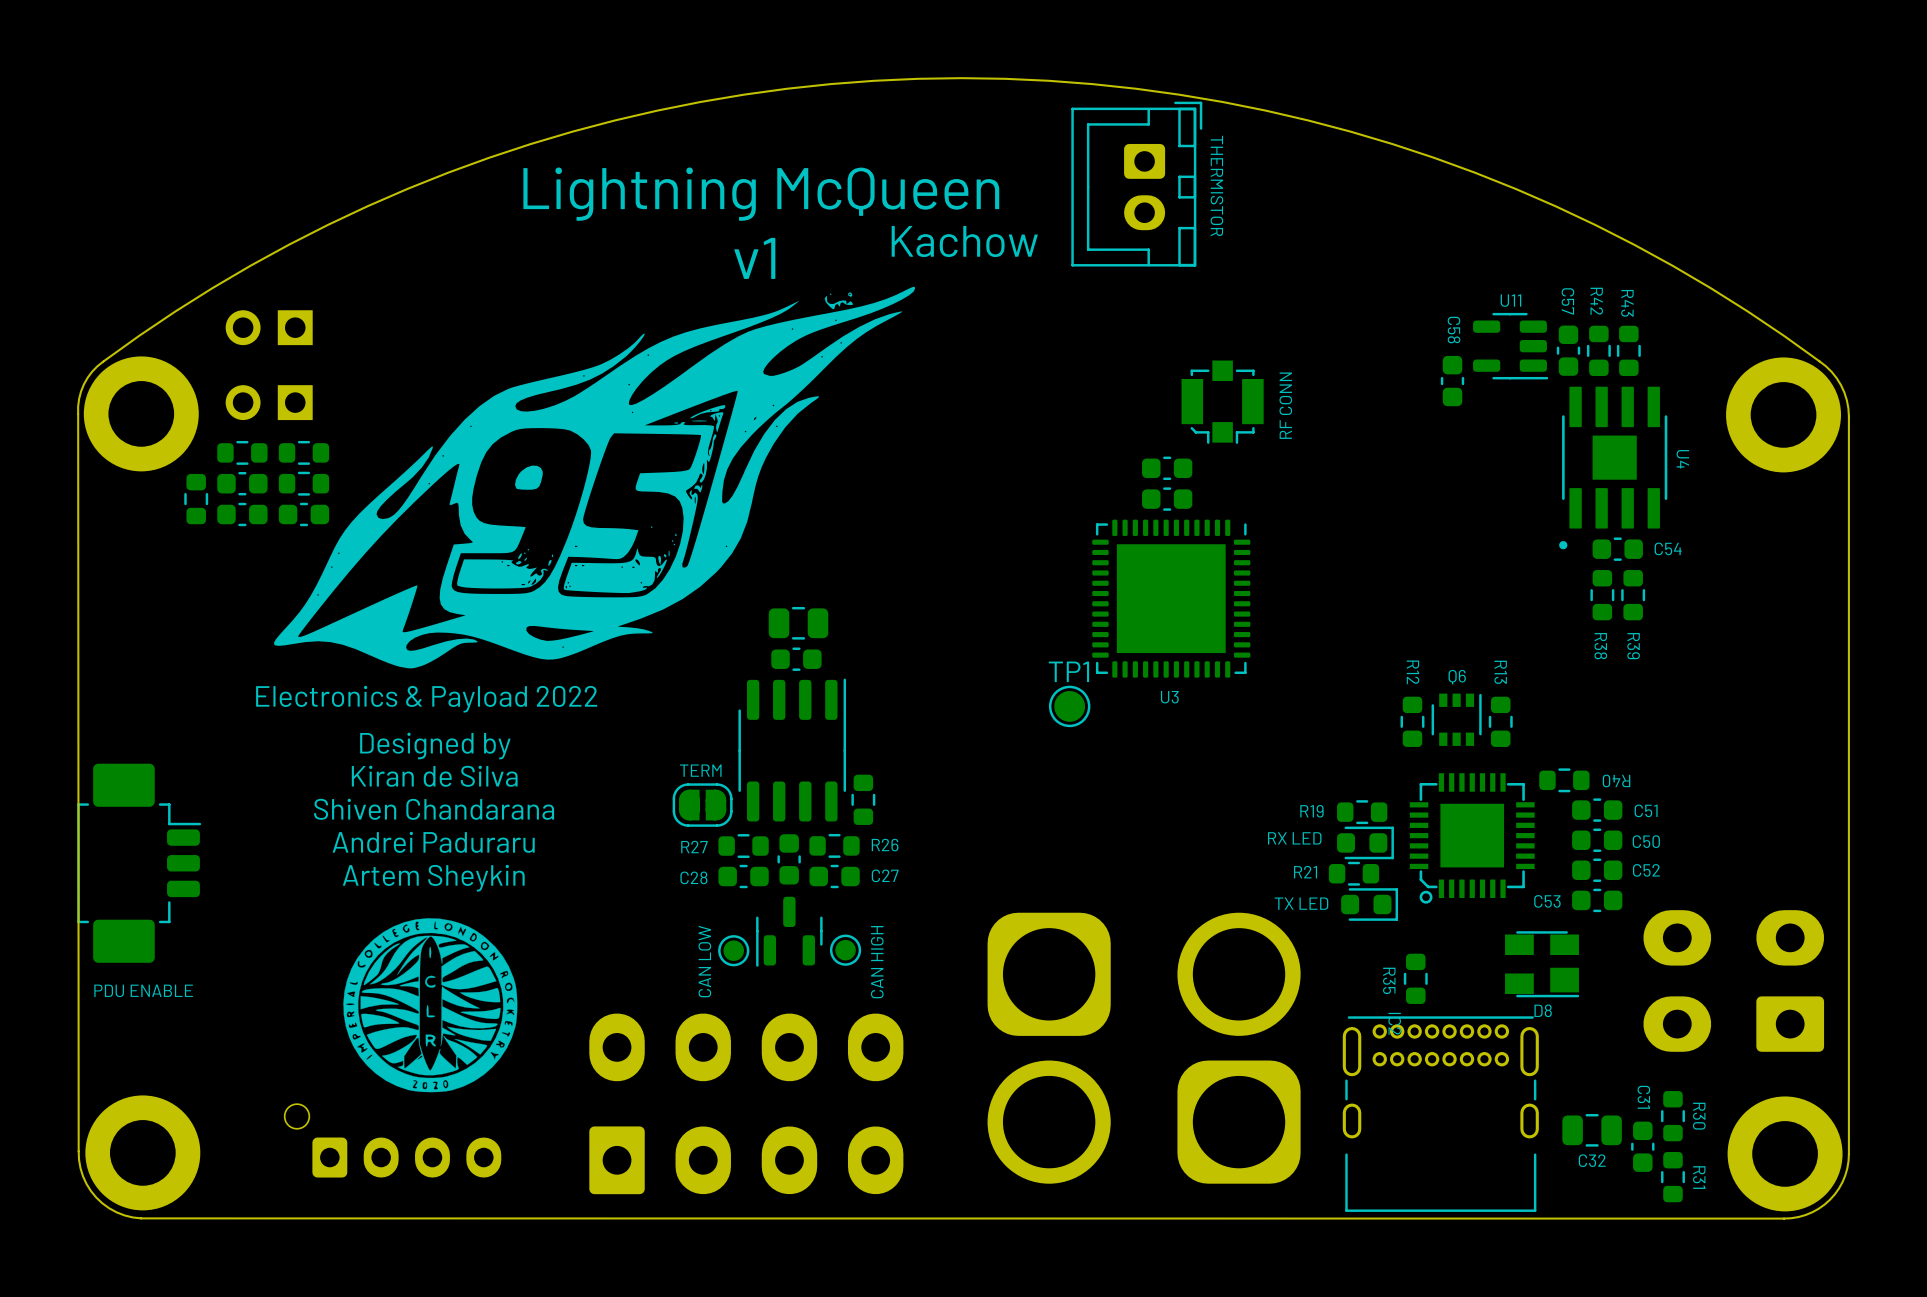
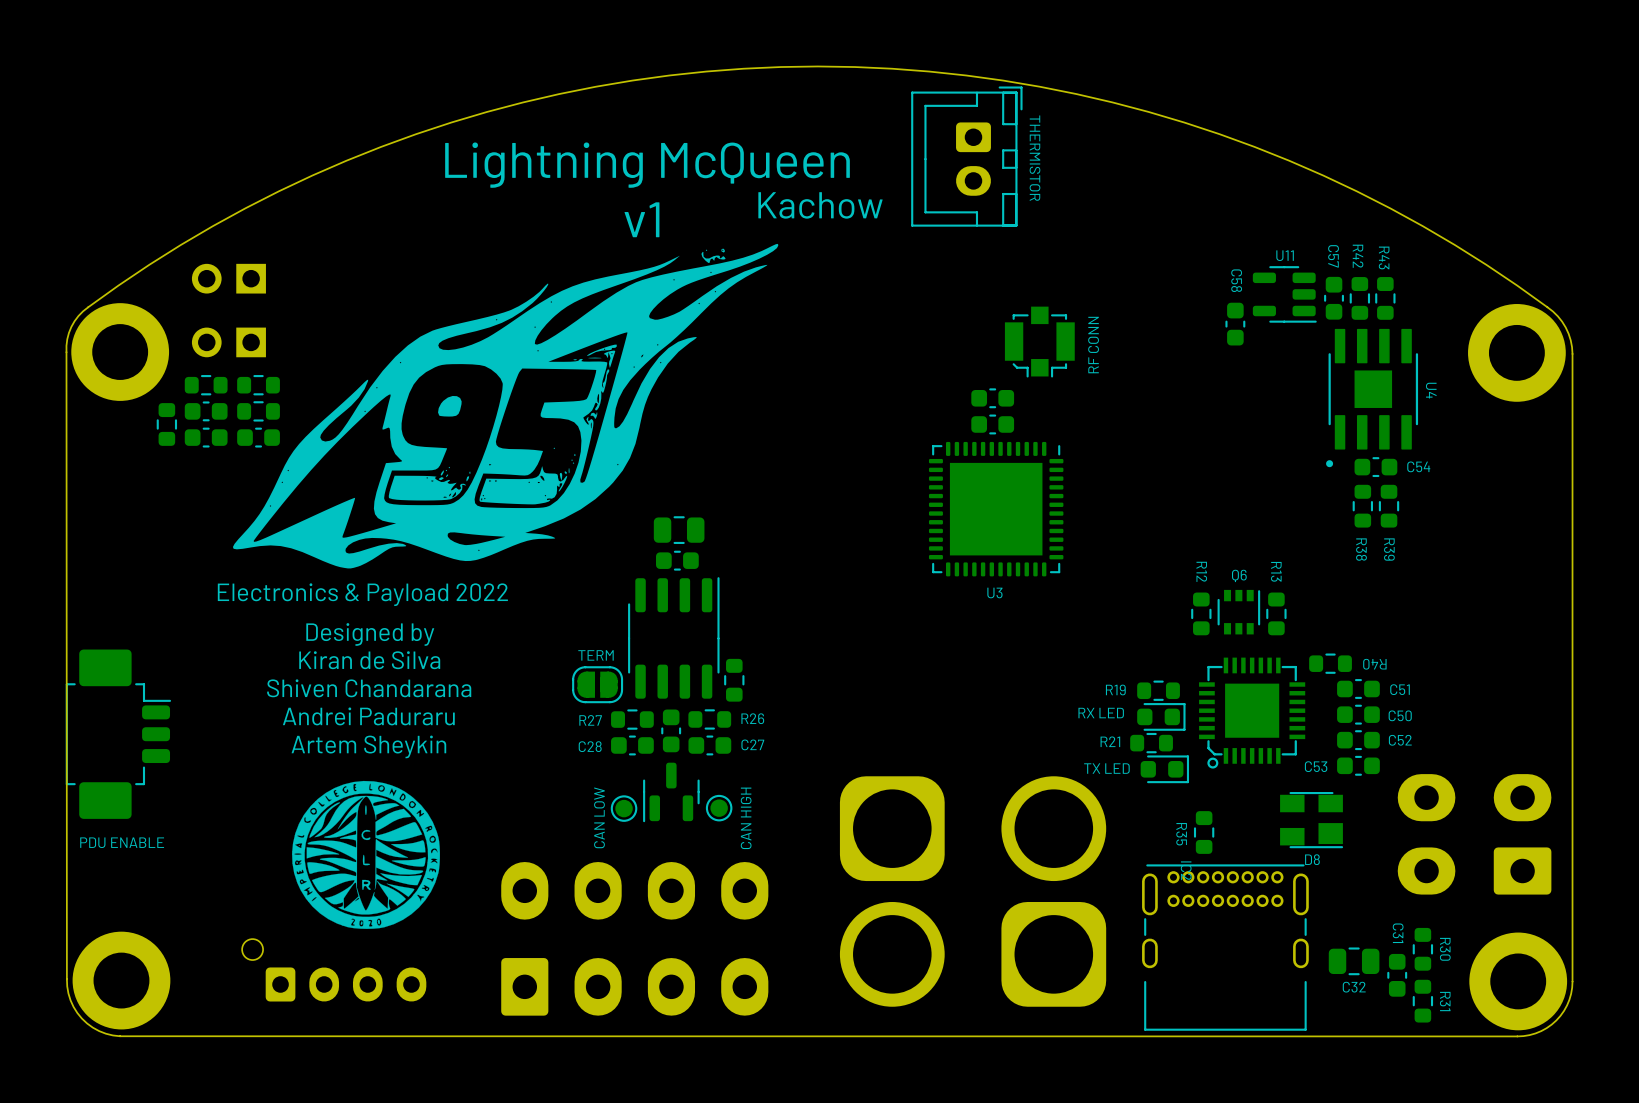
TP1: (1069, 706) -> none

